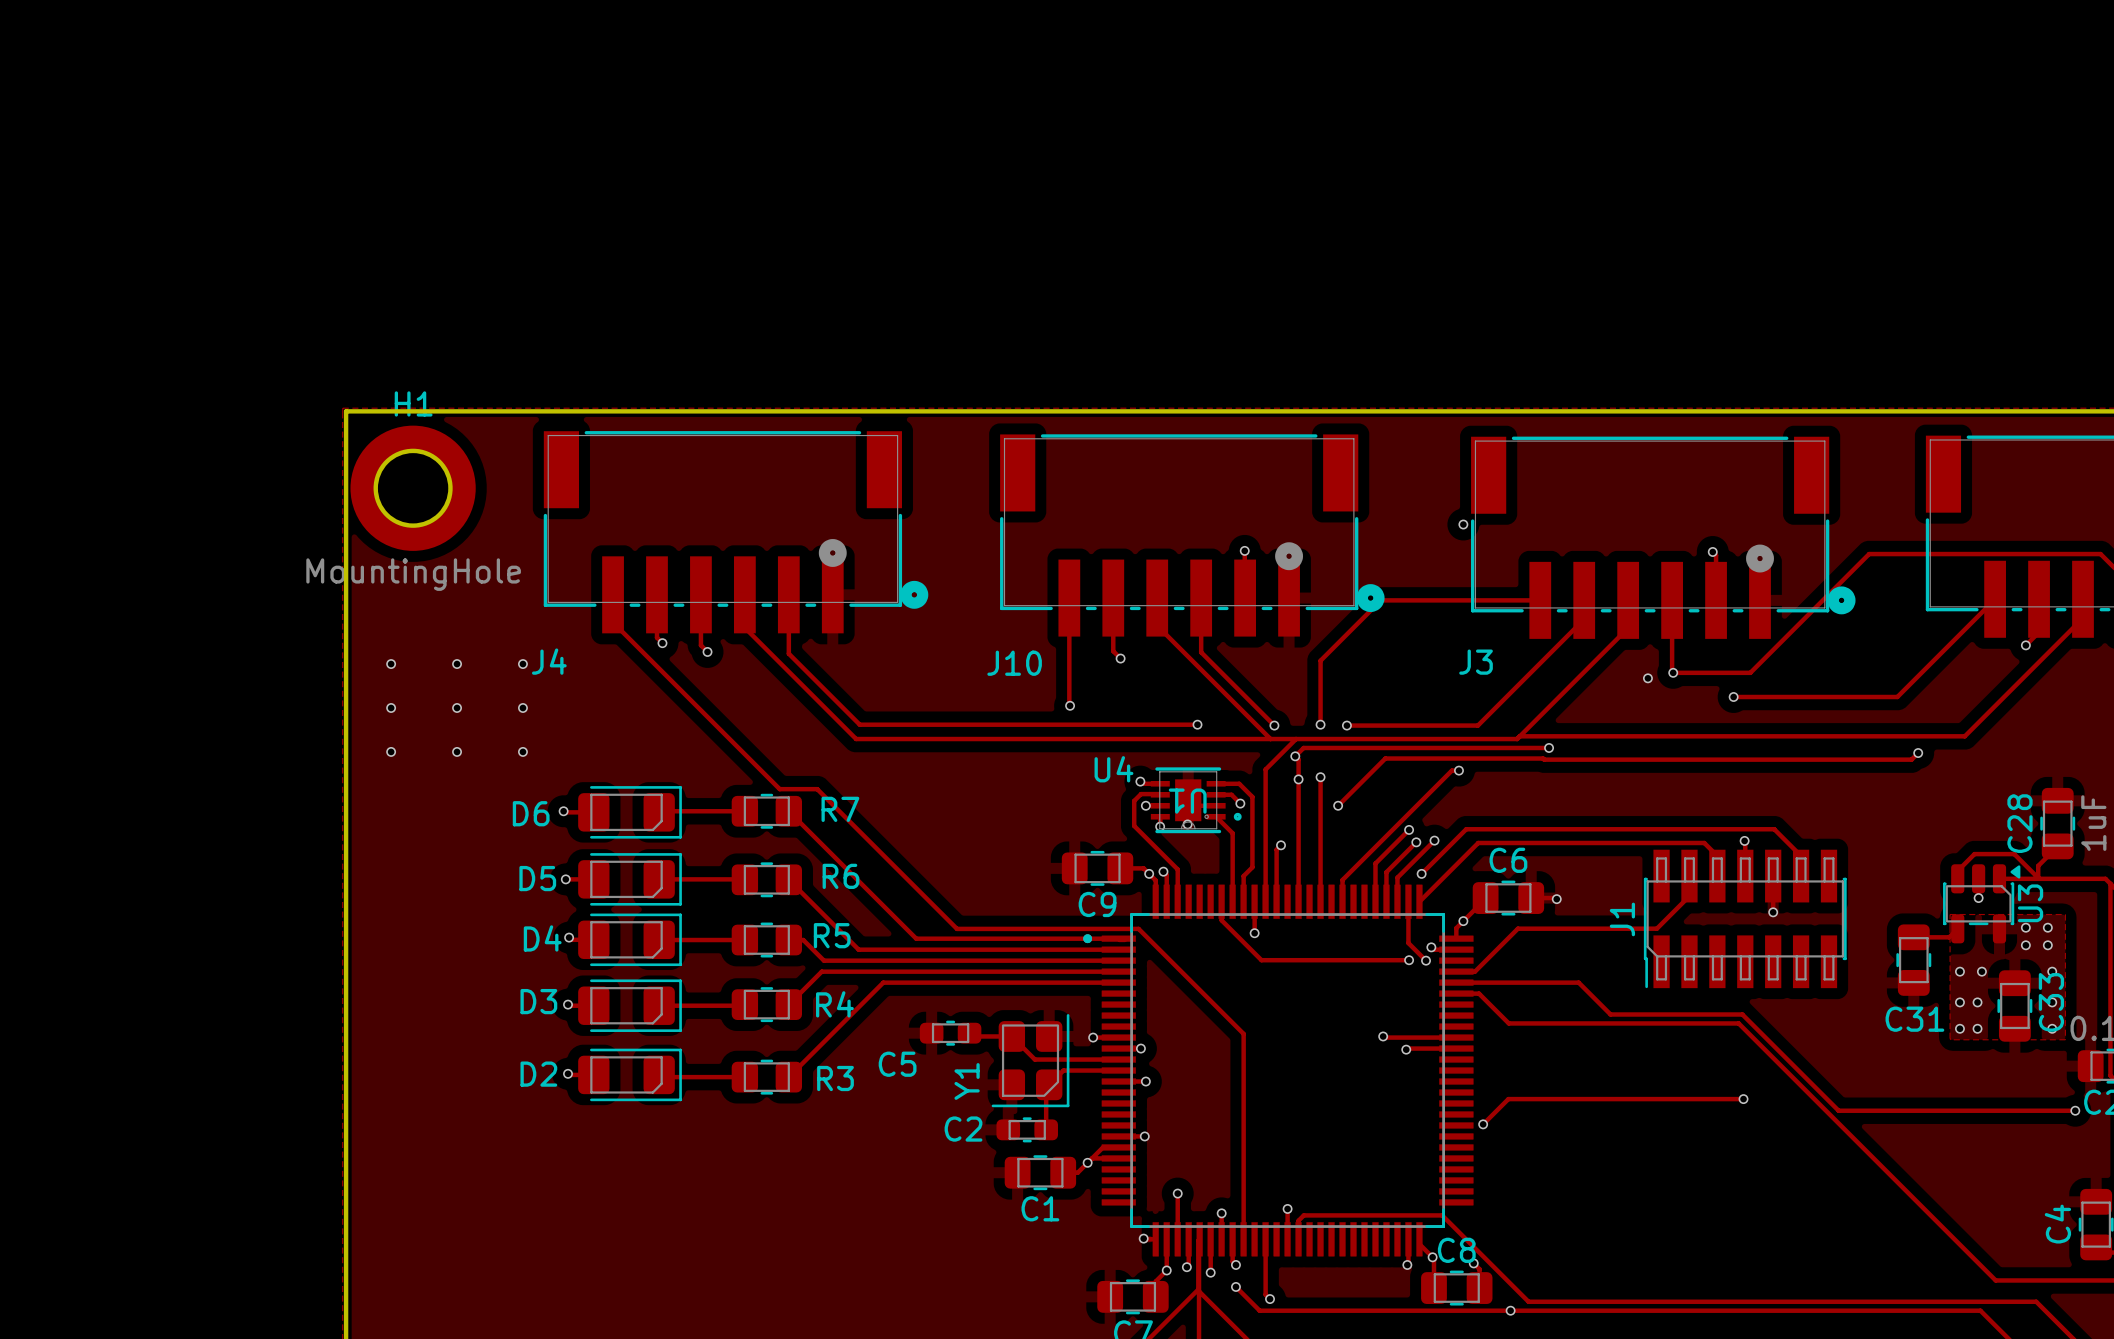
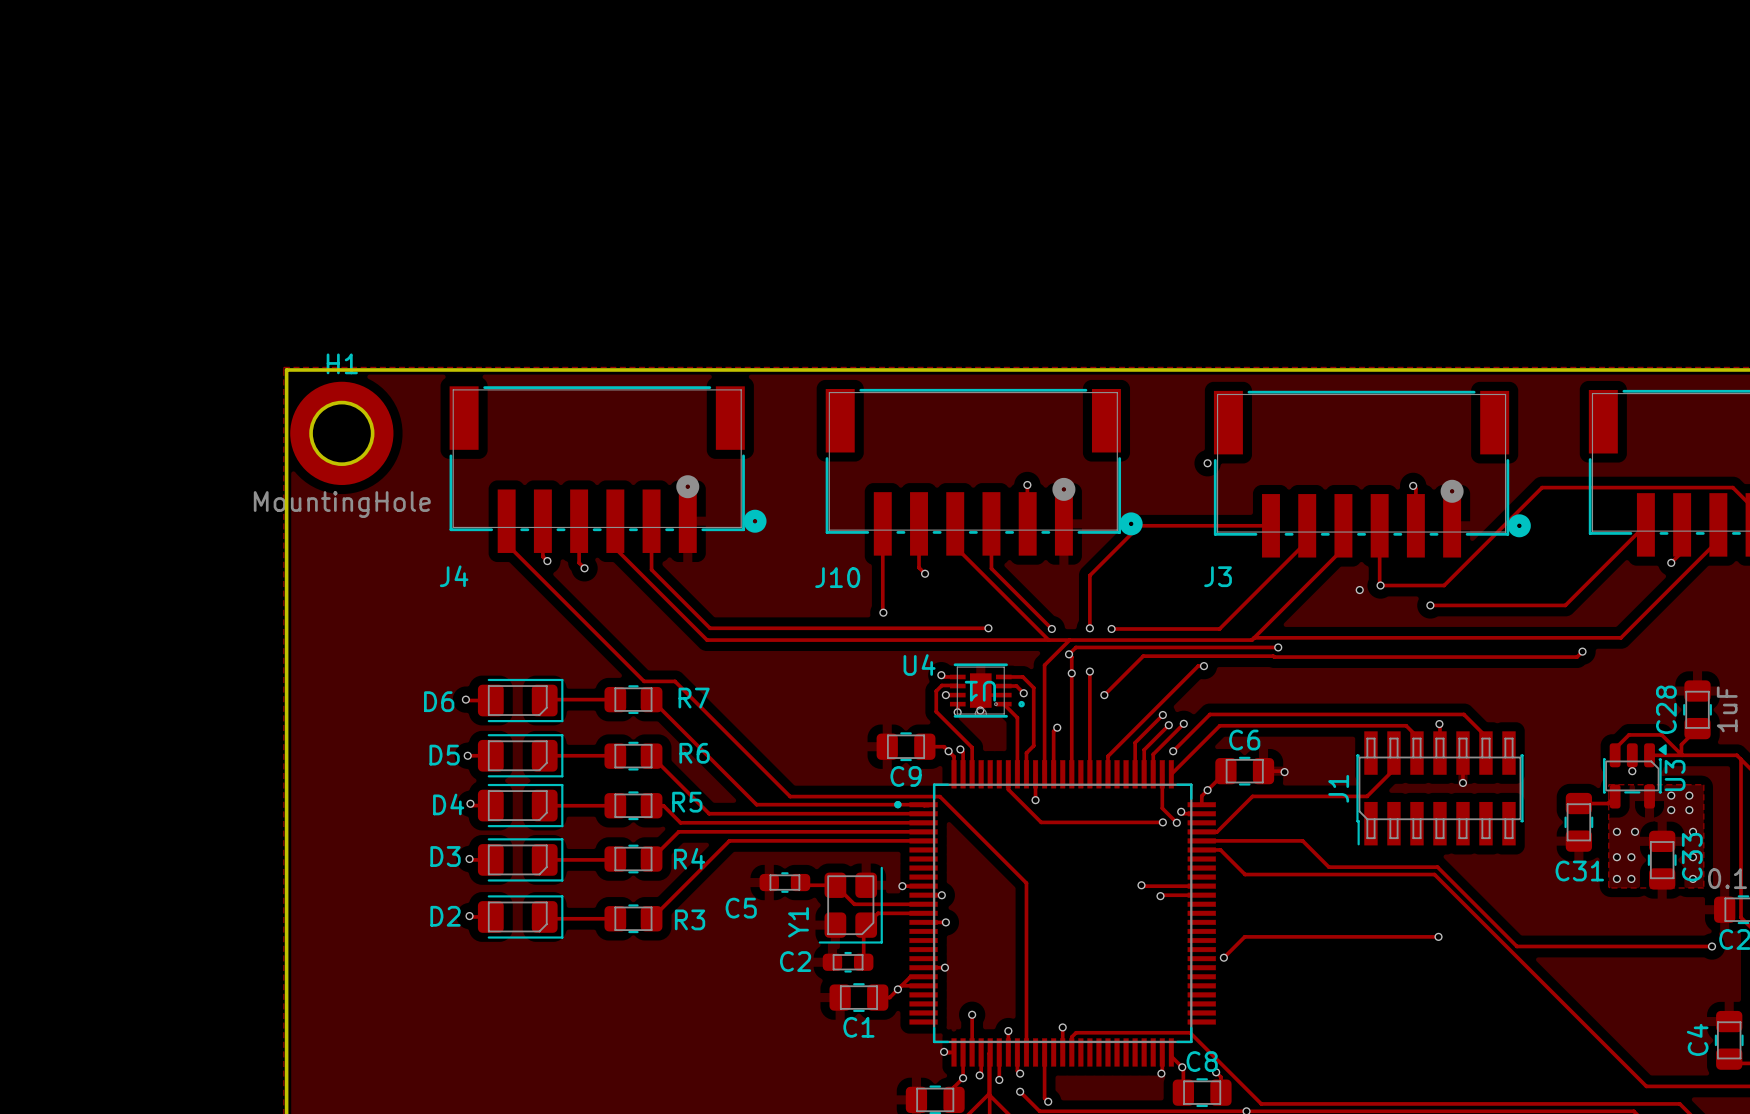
via: (391, 664) -> none
via: (457, 664) -> none
via: (522, 664) -> none
via: (391, 707) -> none
via: (457, 707) -> none
via: (522, 707) -> none
via: (391, 751) -> none
via: (457, 751) -> none
via: (522, 751) -> none

